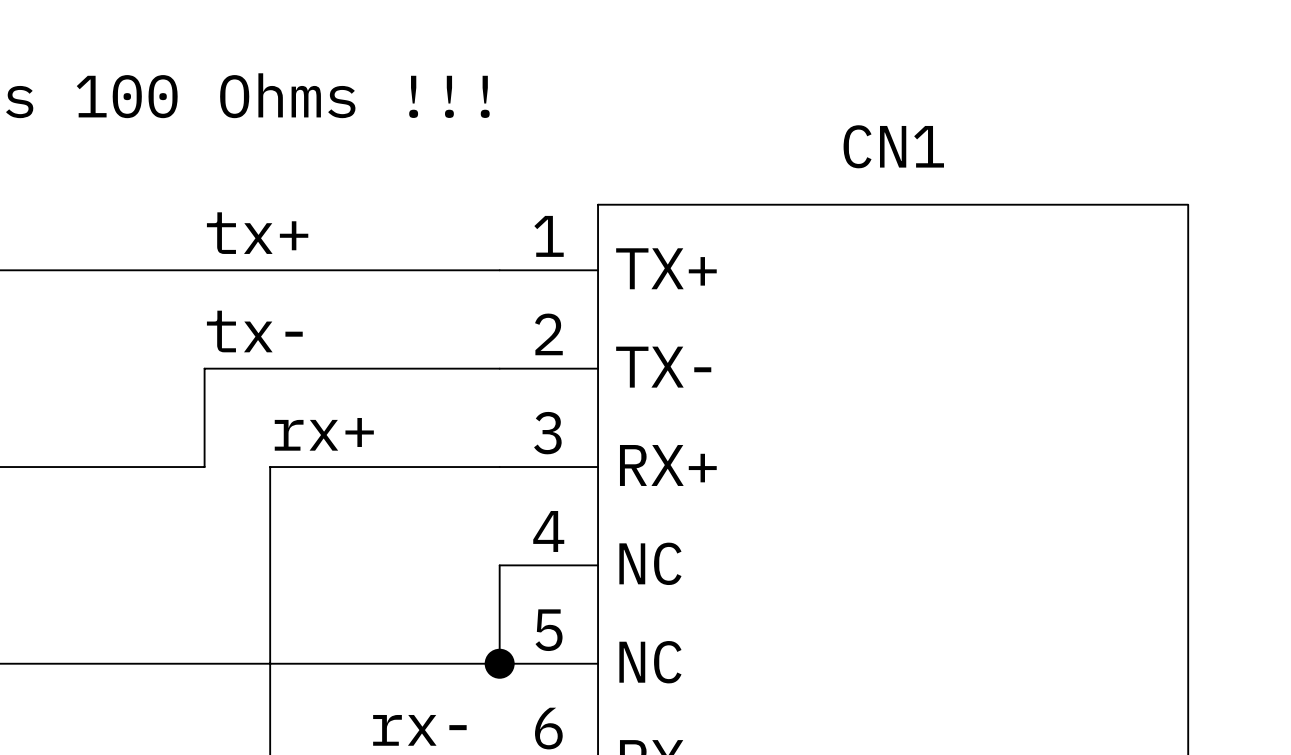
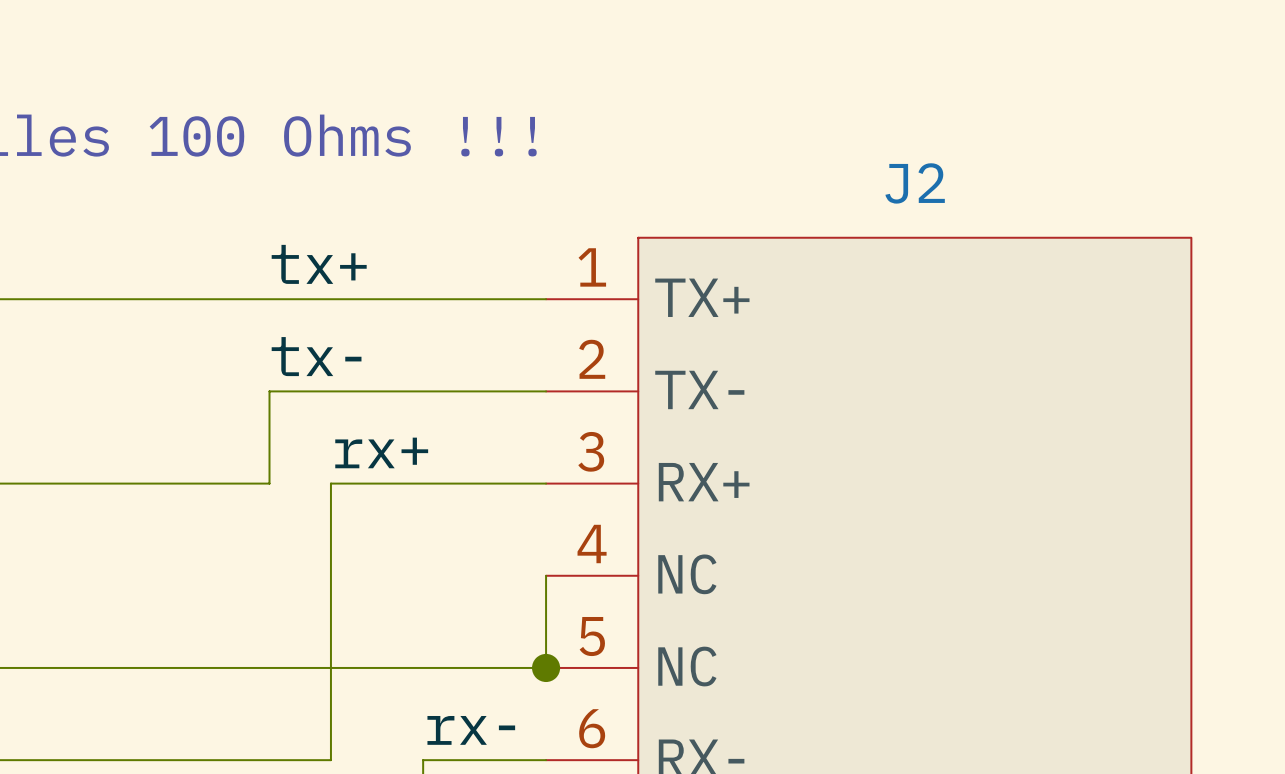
CN1 name: CN1 (893, 146) -> J2 (915, 183)

